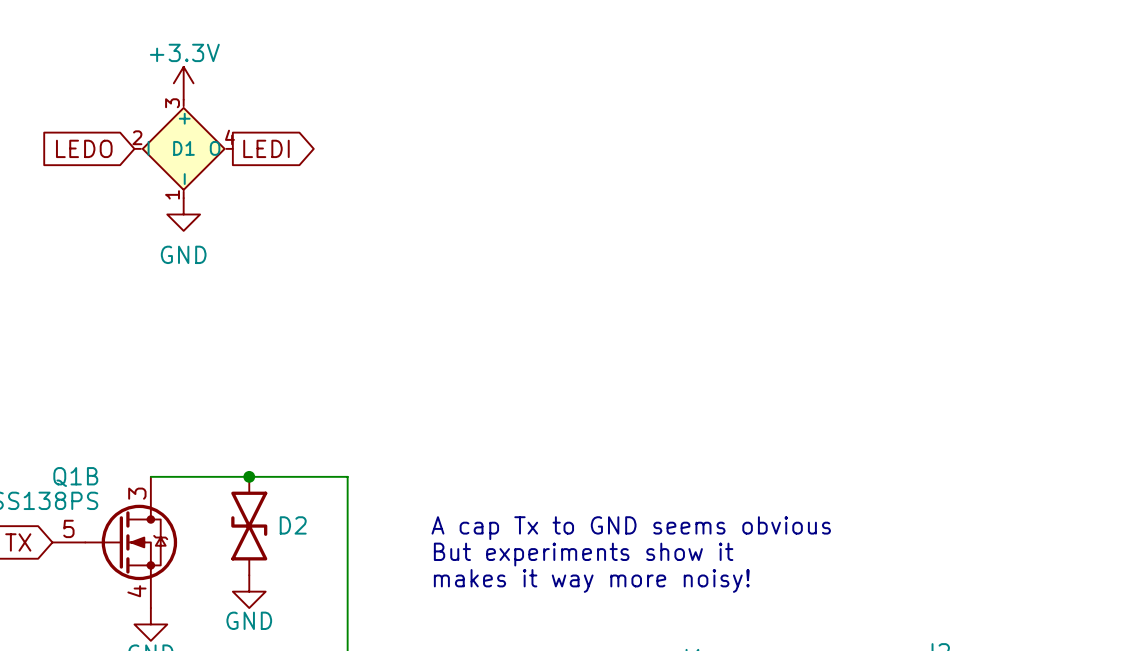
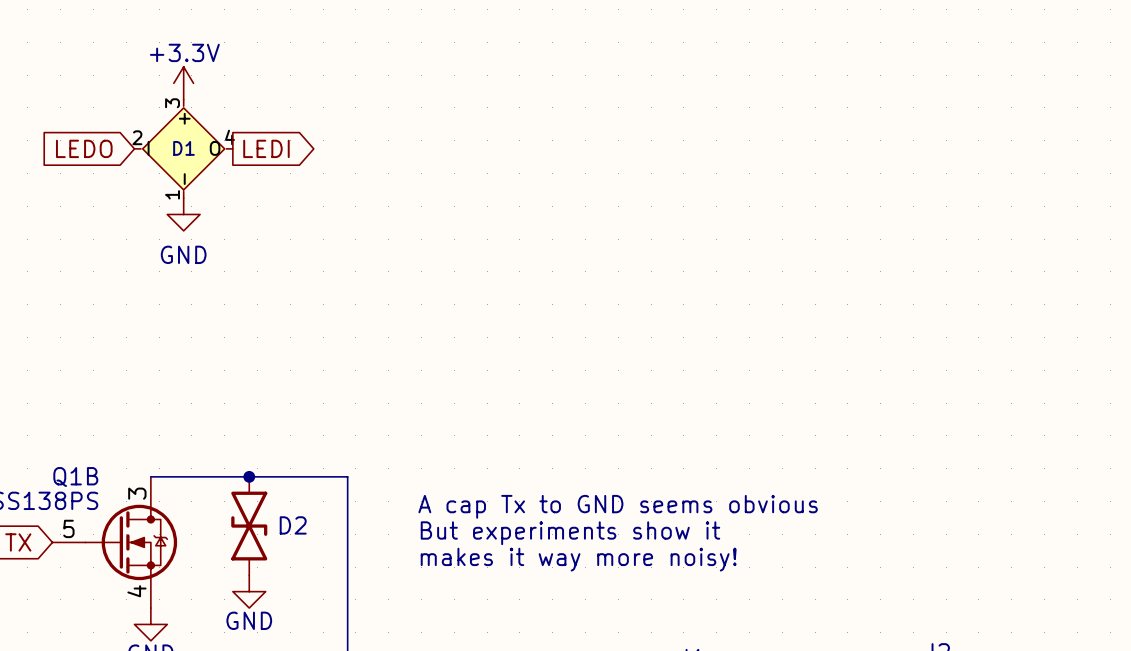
text position: A cap Tx to GND seems obvious (631, 528) -> A cap Tx to GND seems obvious (618, 506)
text position: But experiments show it (583, 554) -> But experiments show it (570, 533)
text position: makes it way more noisy! (591, 580) -> makes it way more noisy! (578, 559)

